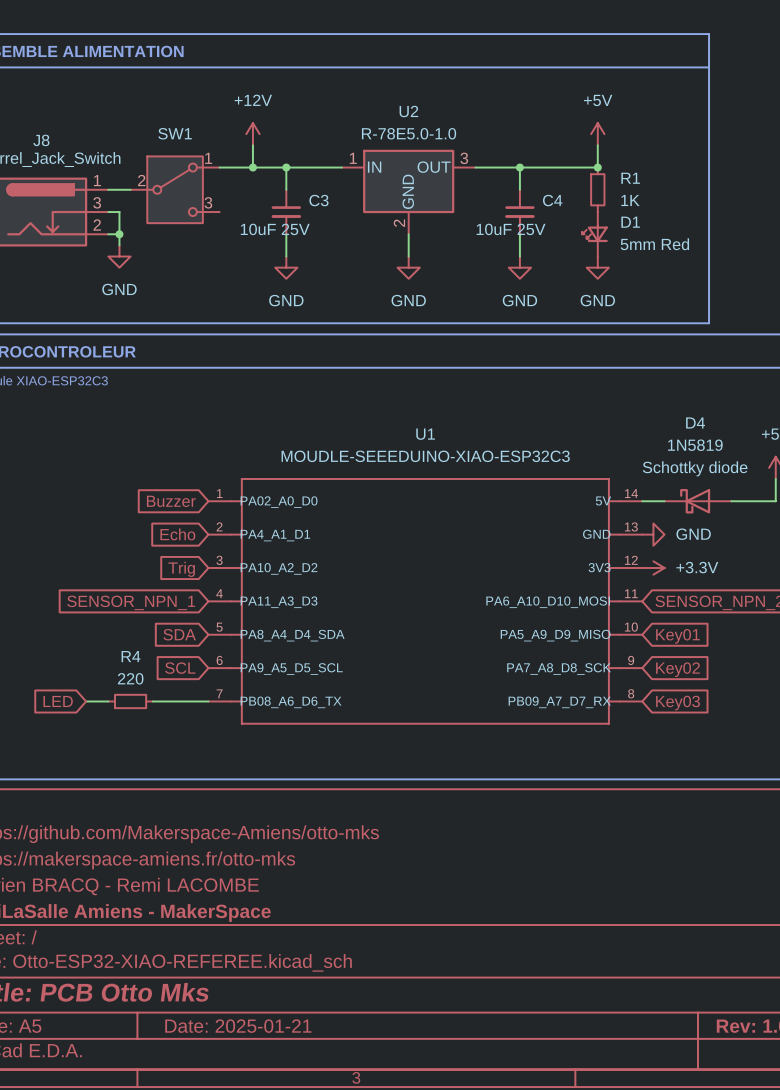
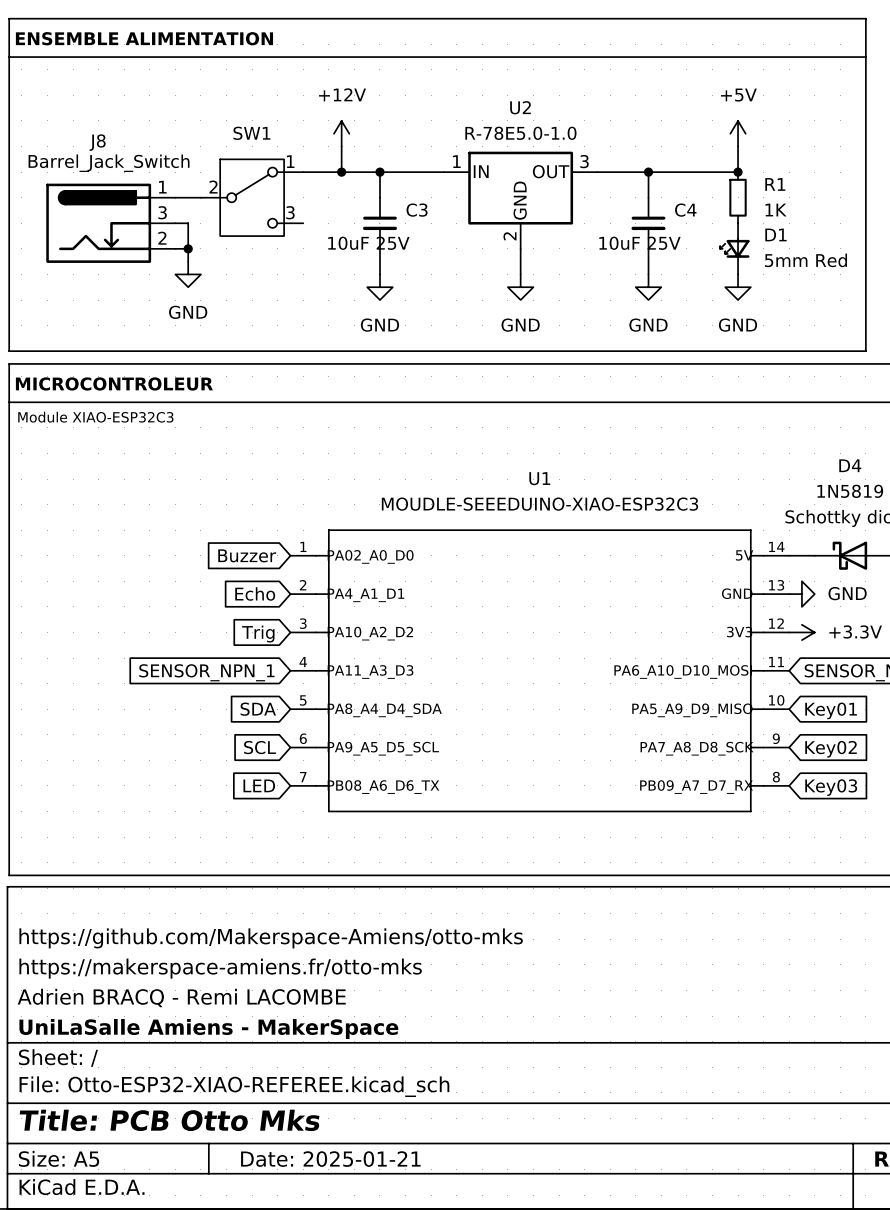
global label position: LED (58, 701) -> LED (259, 785)
wire: (86, 701) (108, 701) -> none
R4: 220 (130, 701) -> none
wire: (152, 701) (208, 701) -> none

